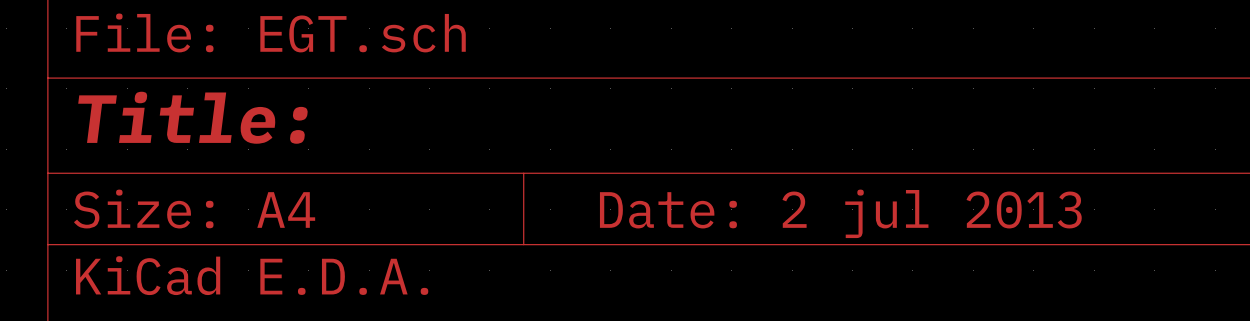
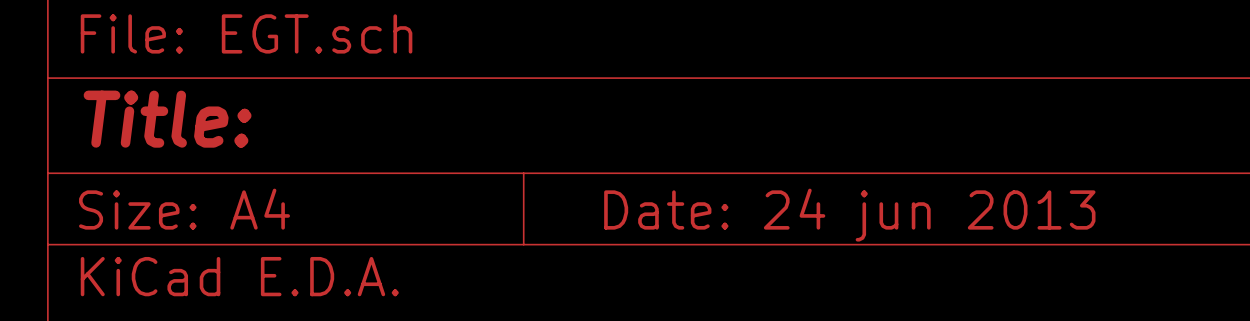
title block: Date: 2 jul 2013 (840, 213) -> Date: 24 jun 2013 (849, 215)

